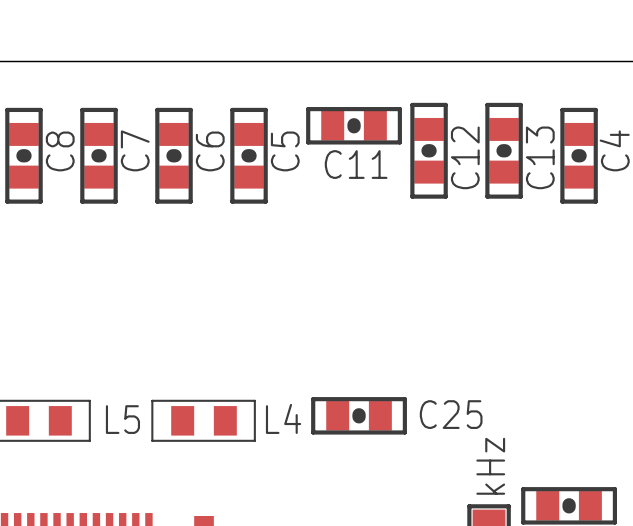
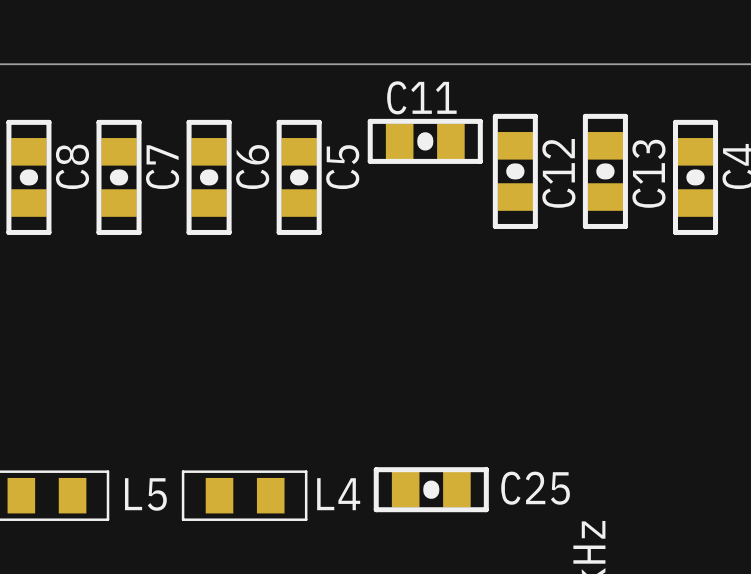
C11 name position: C11 (356, 164) -> C11 (421, 97)

